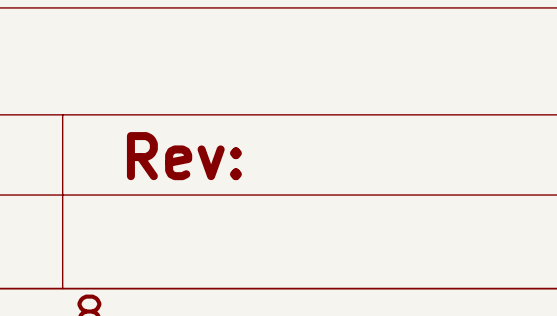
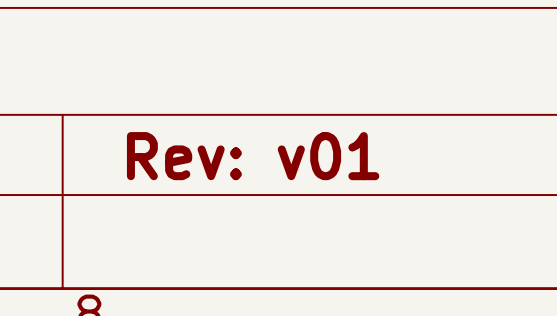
title block: Rev: (184, 156) -> Rev: v01 (253, 156)

